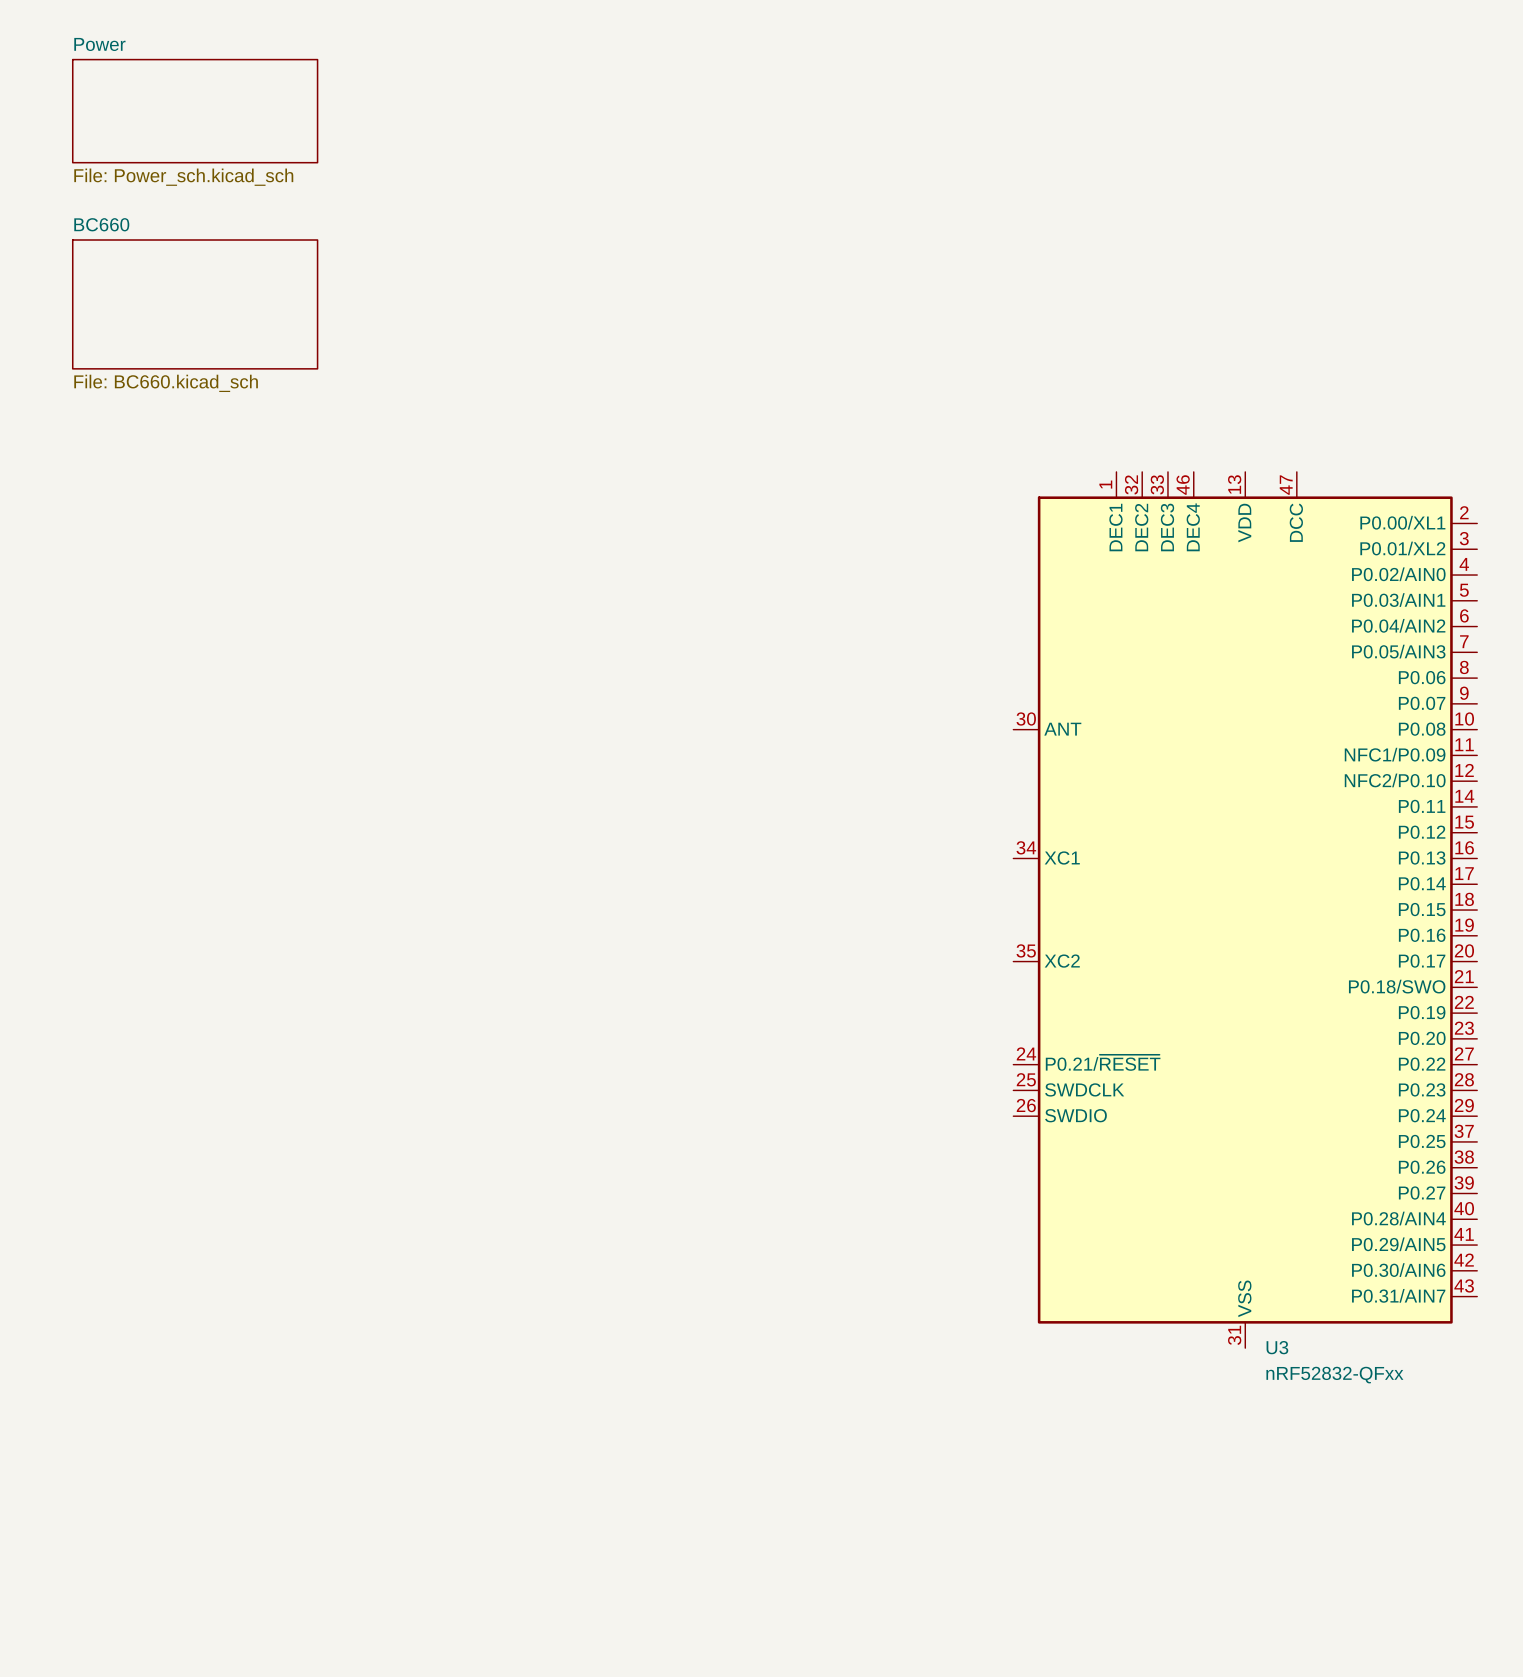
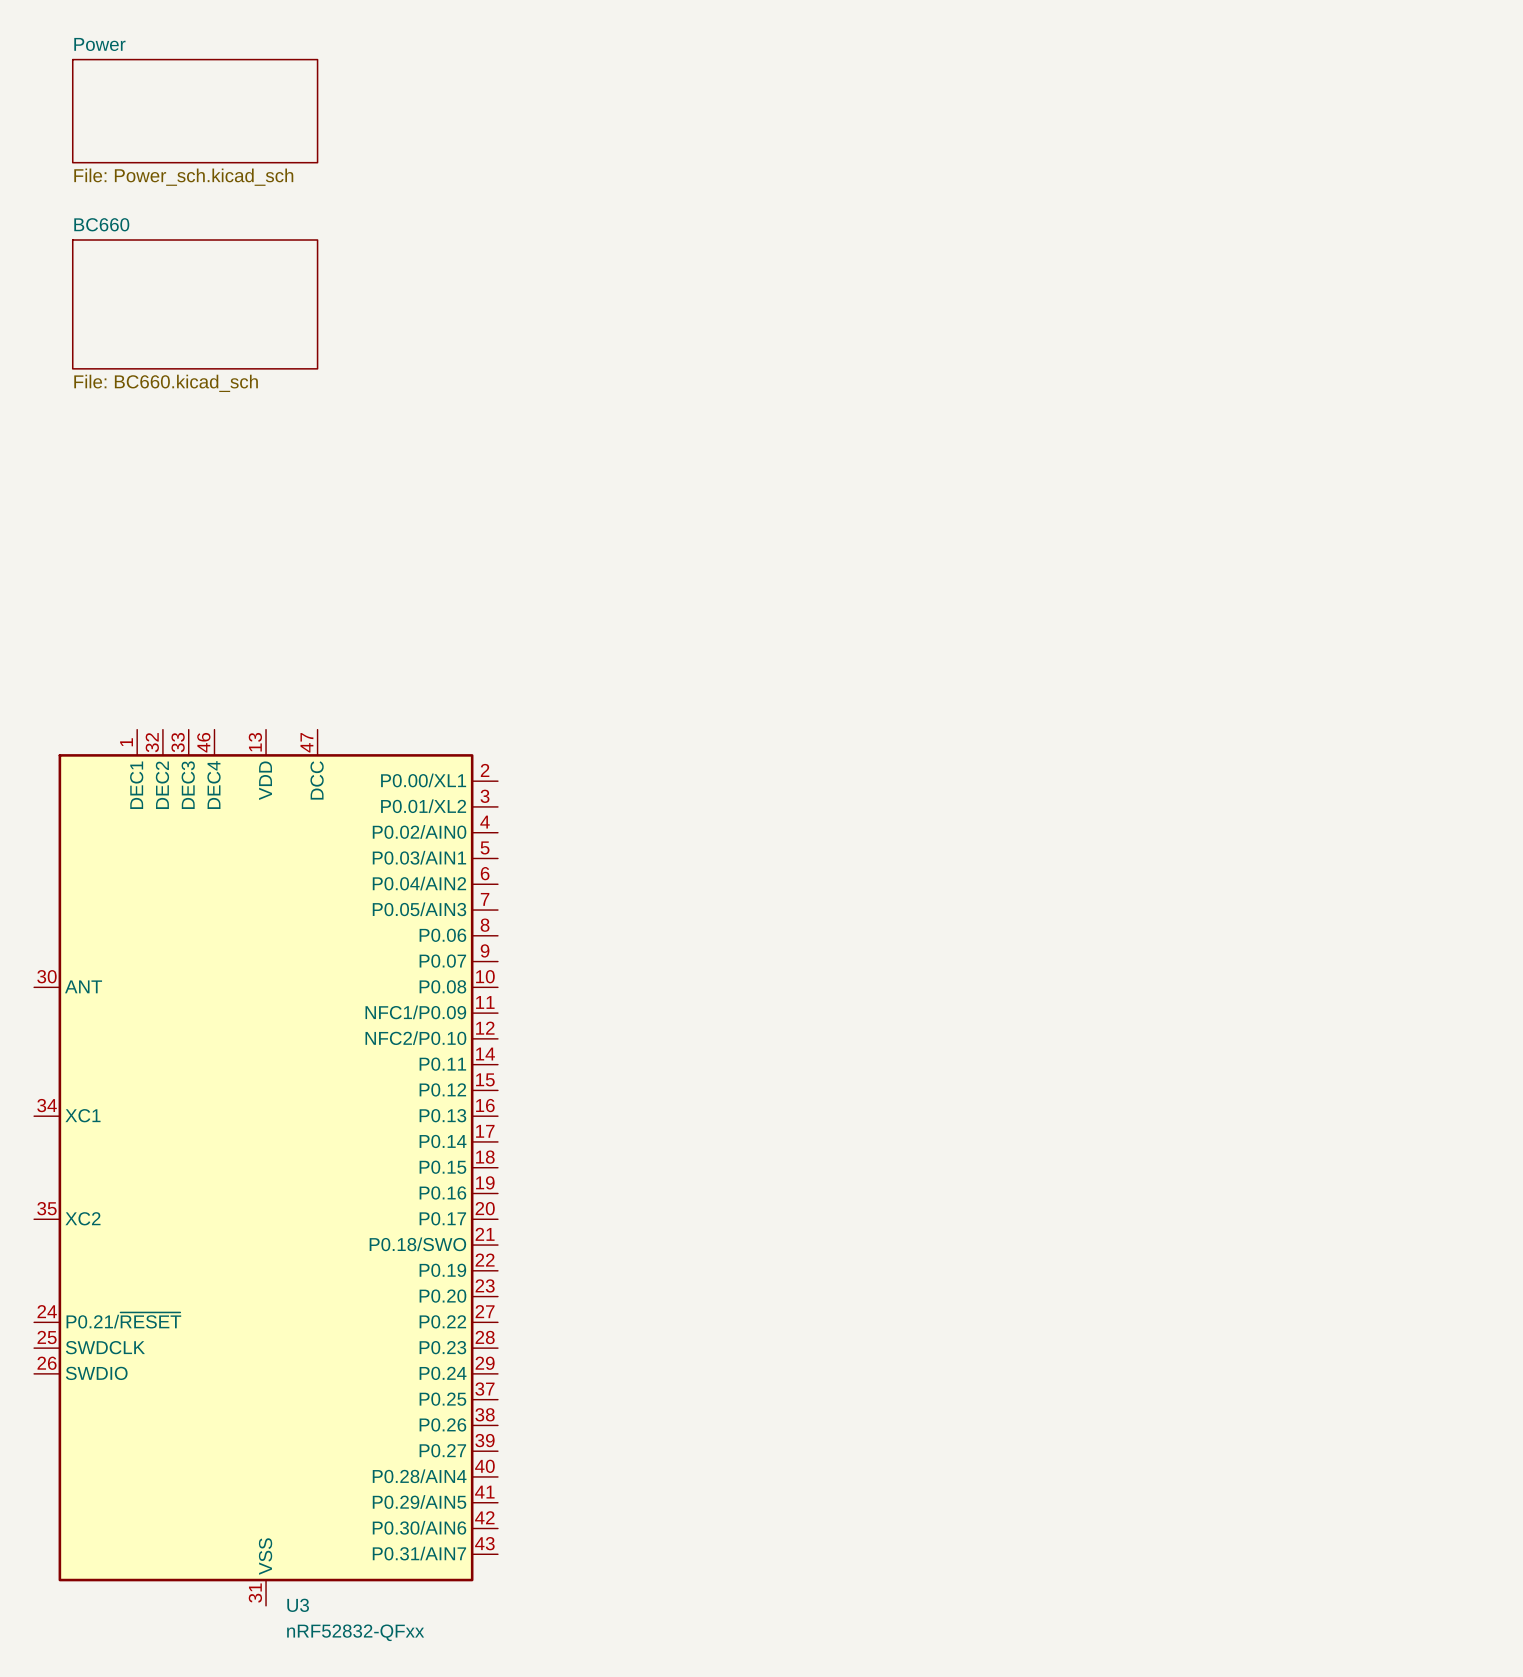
U3 position: (1245, 910) -> (266, 1167)

